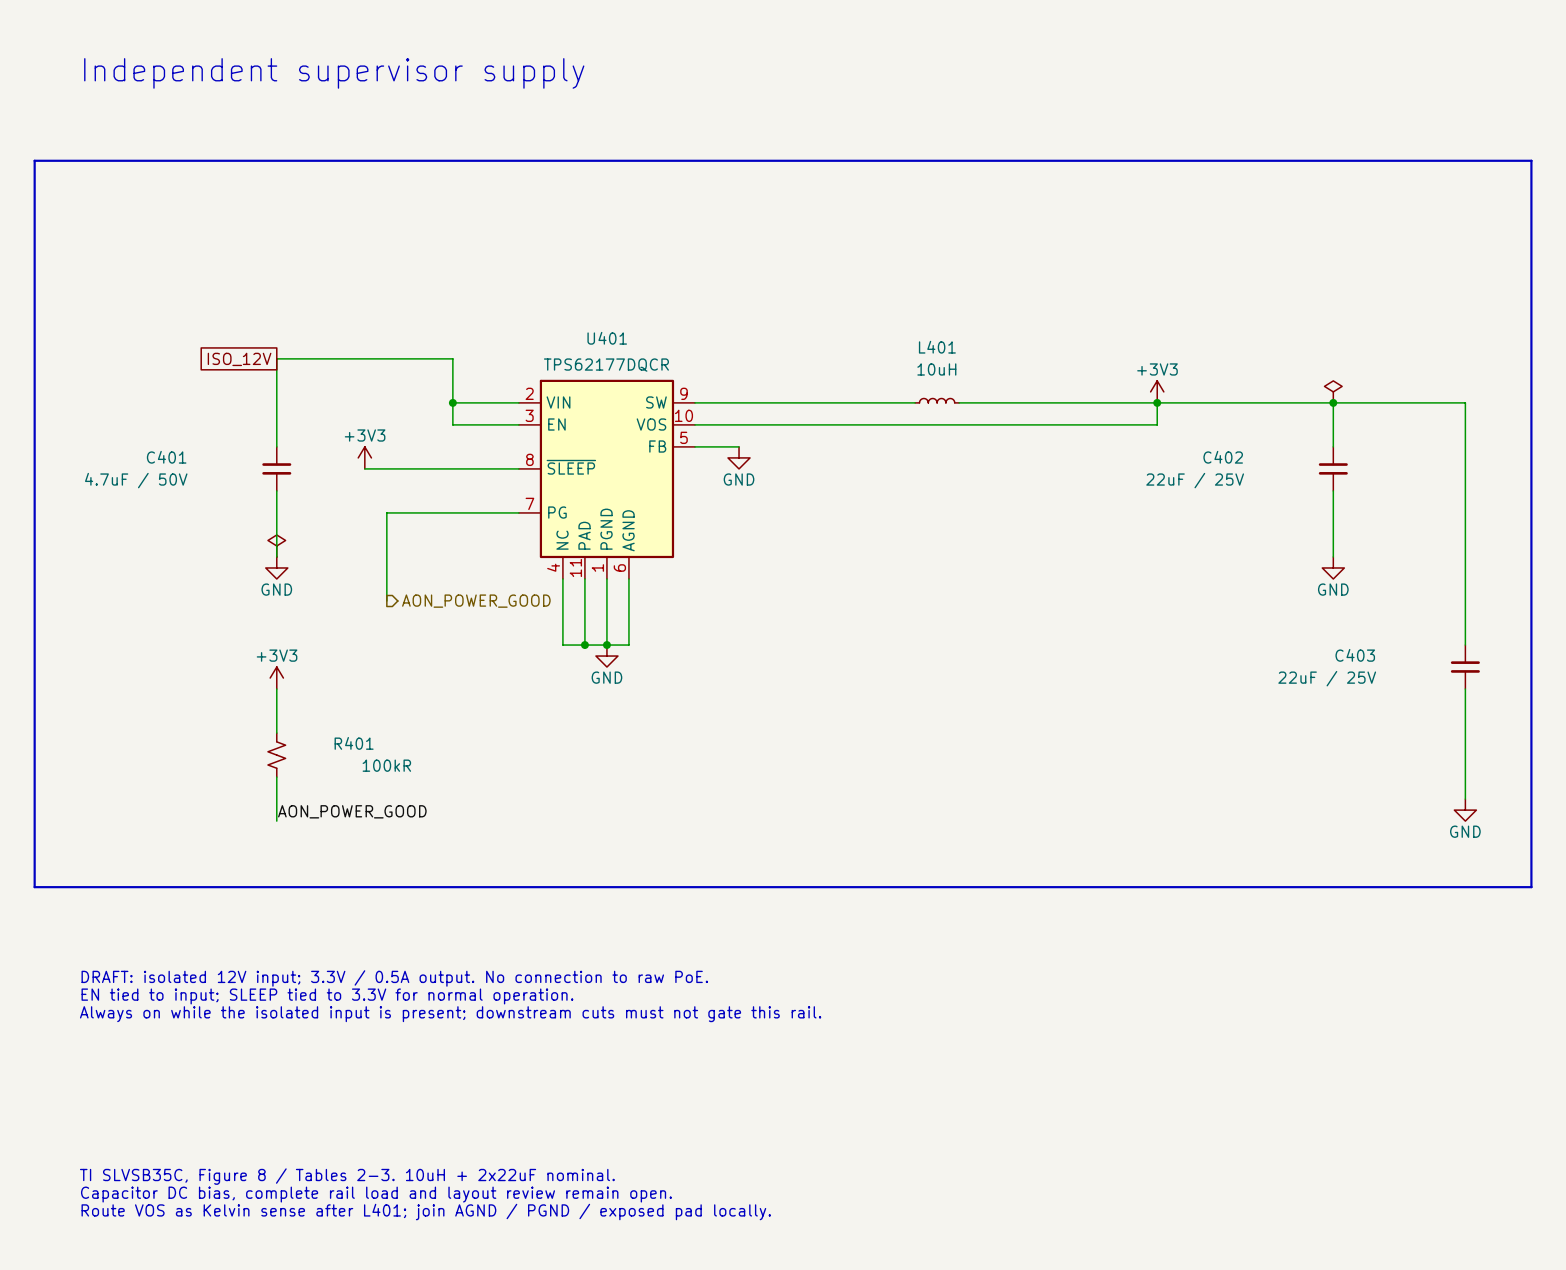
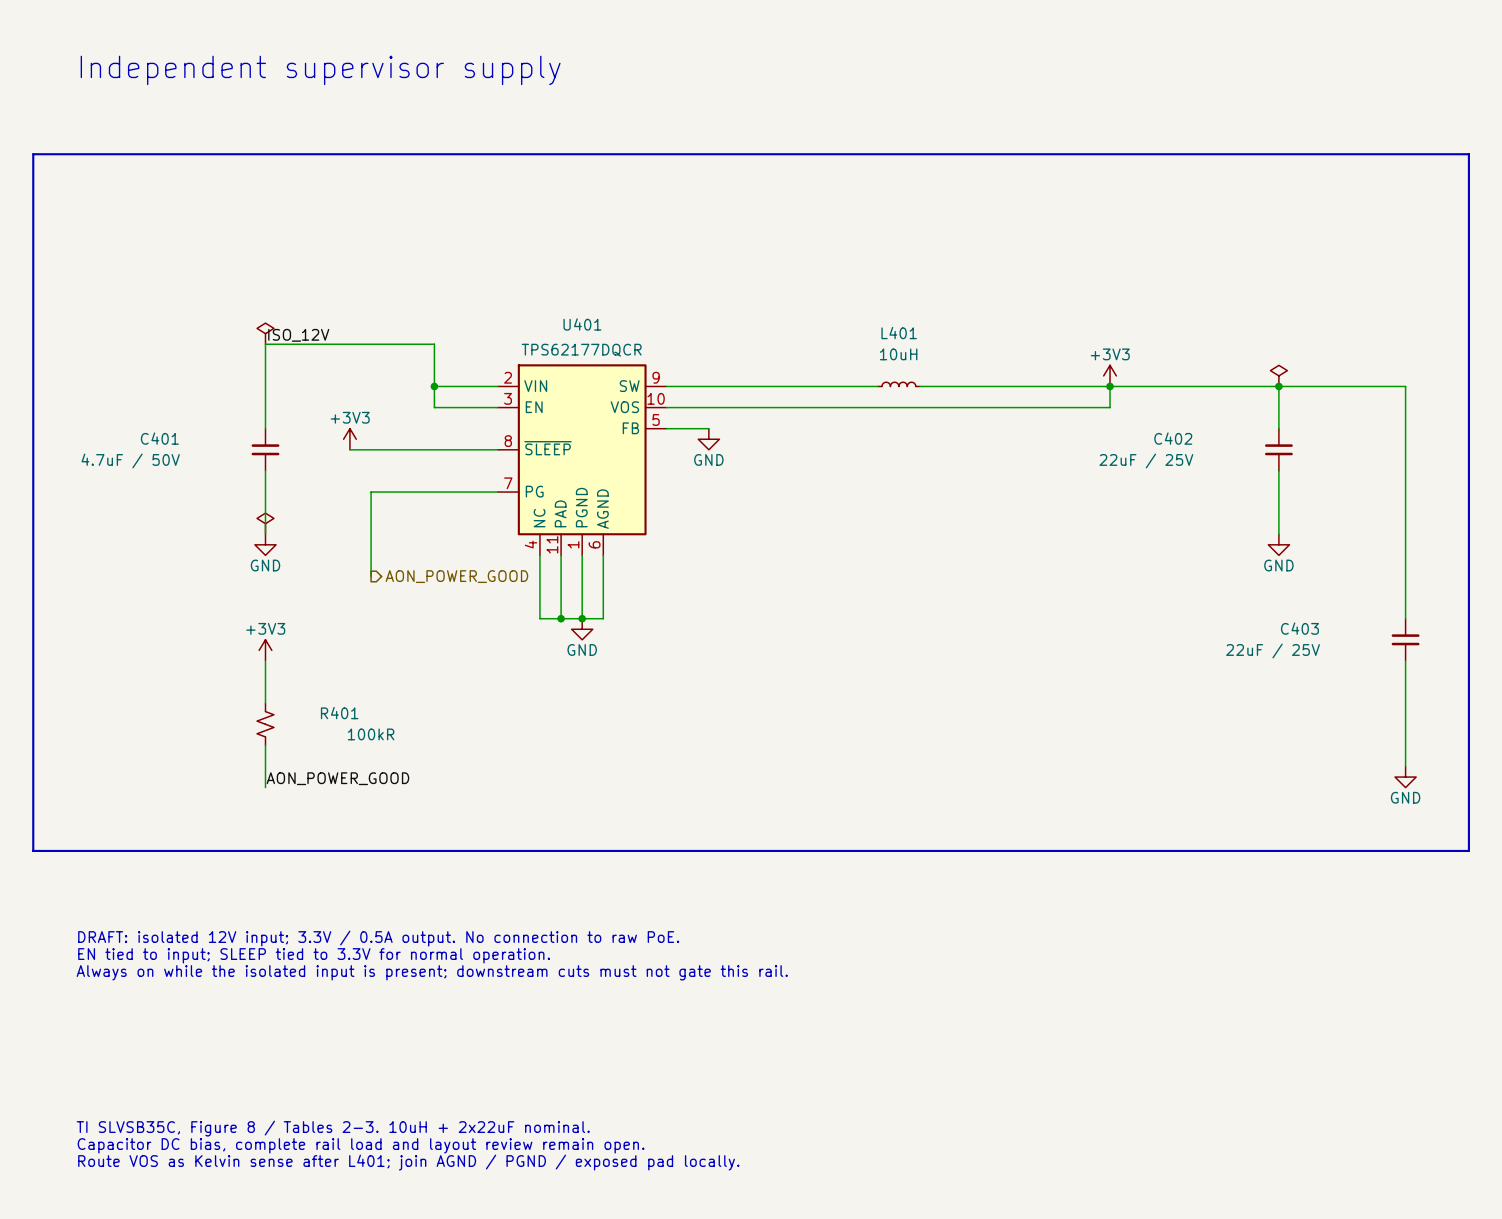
power symbol: none -> (265, 333)
label: none -> ISO_12V (298, 335)
global label: ISO_12V (239, 359) -> none

